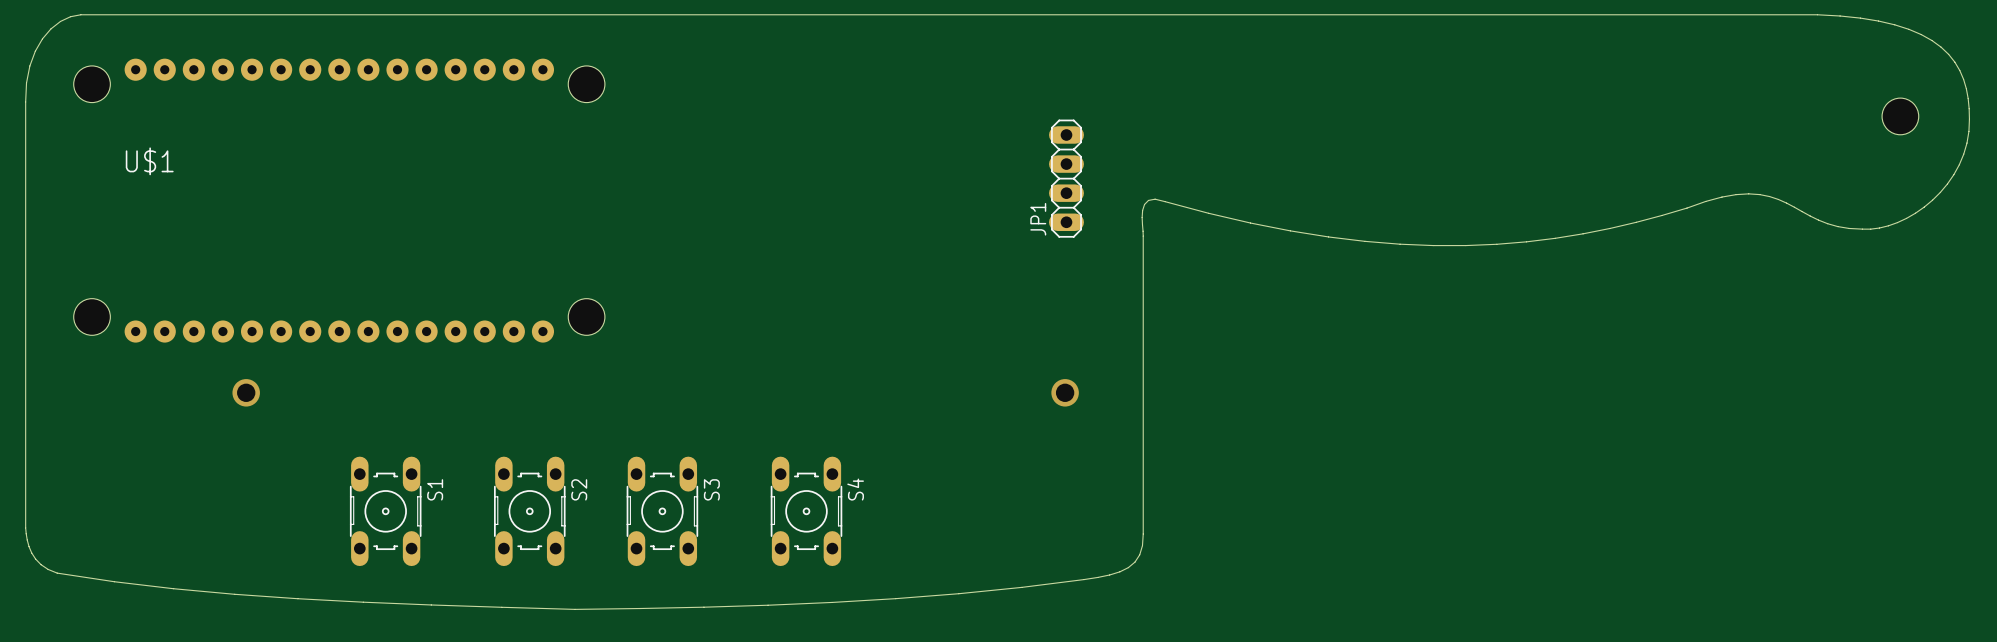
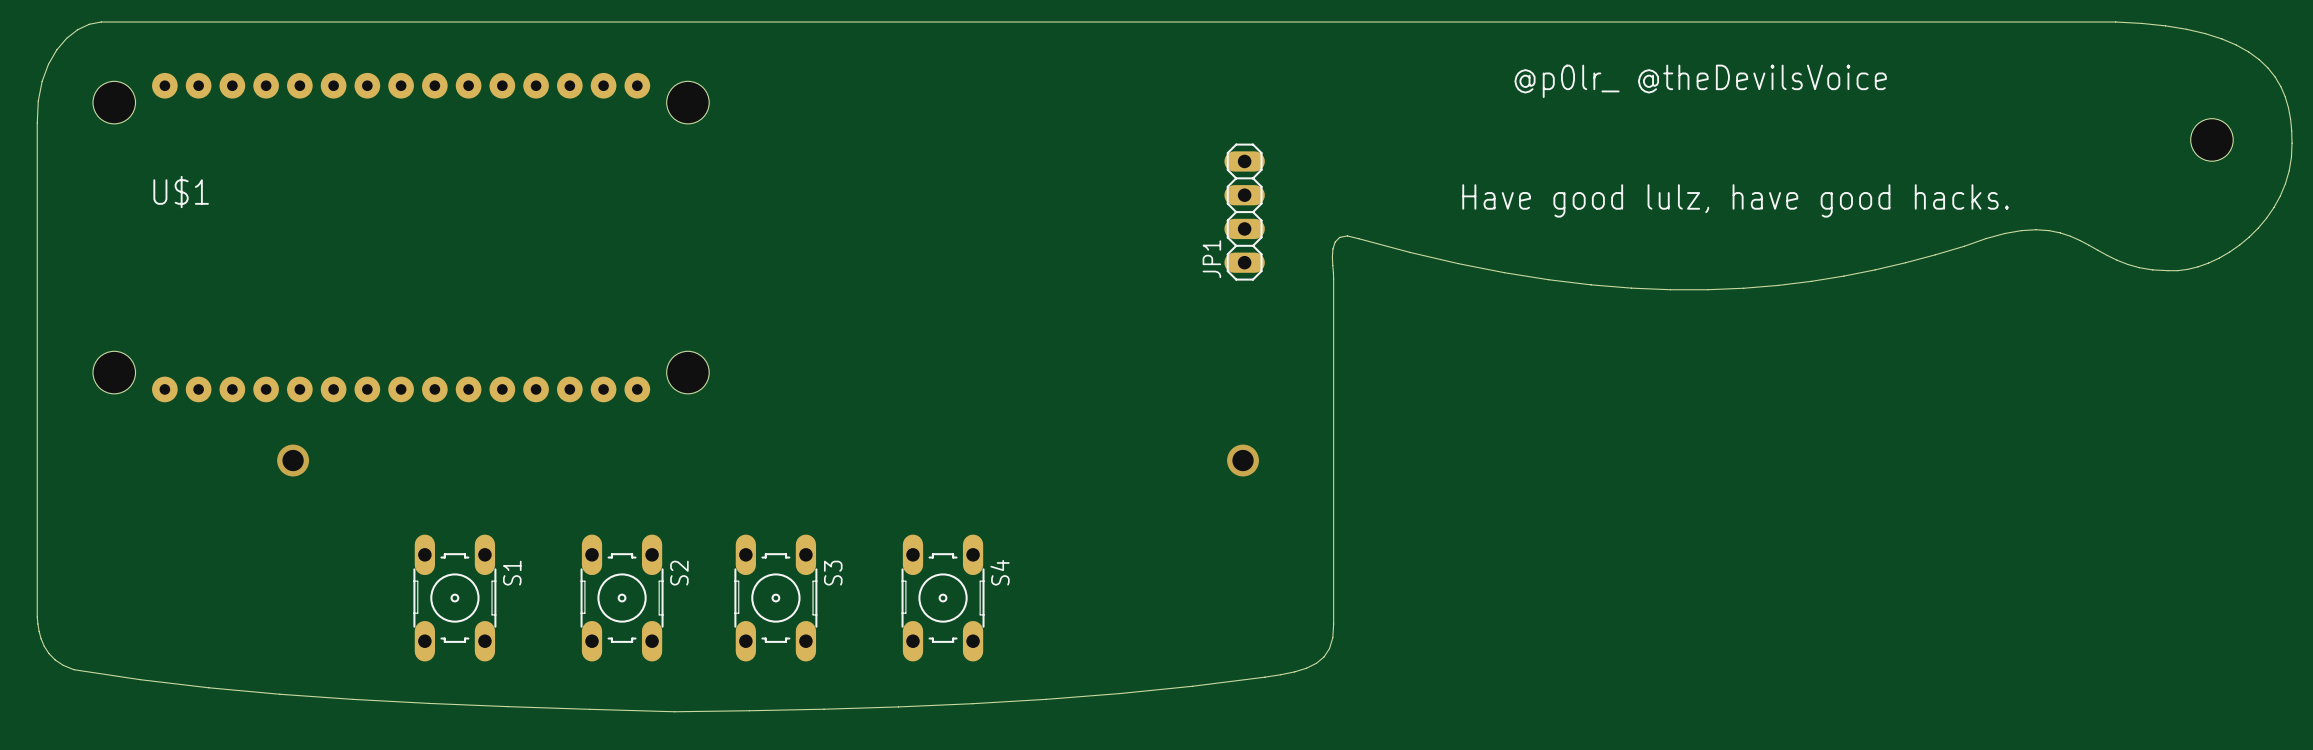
text: none -> @p0lr_ @theDevilsVoice (1700, 81)
text: none -> Have good lulz, have good hacks. (1735, 200)

